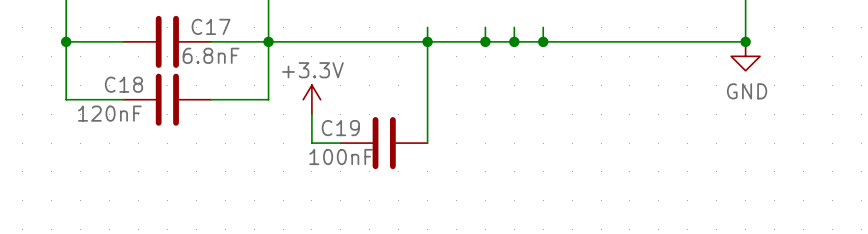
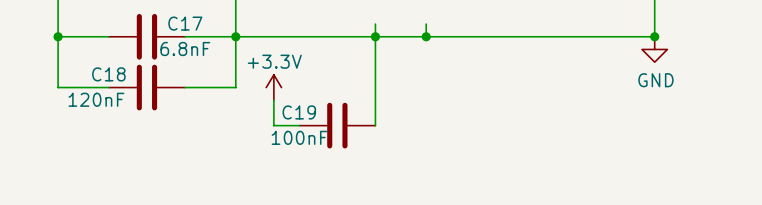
wire: (514, 27) (514, 41) -> none
wire: (543, 27) (543, 41) -> none
junction: (514, 41) -> none
junction: (543, 41) -> none

